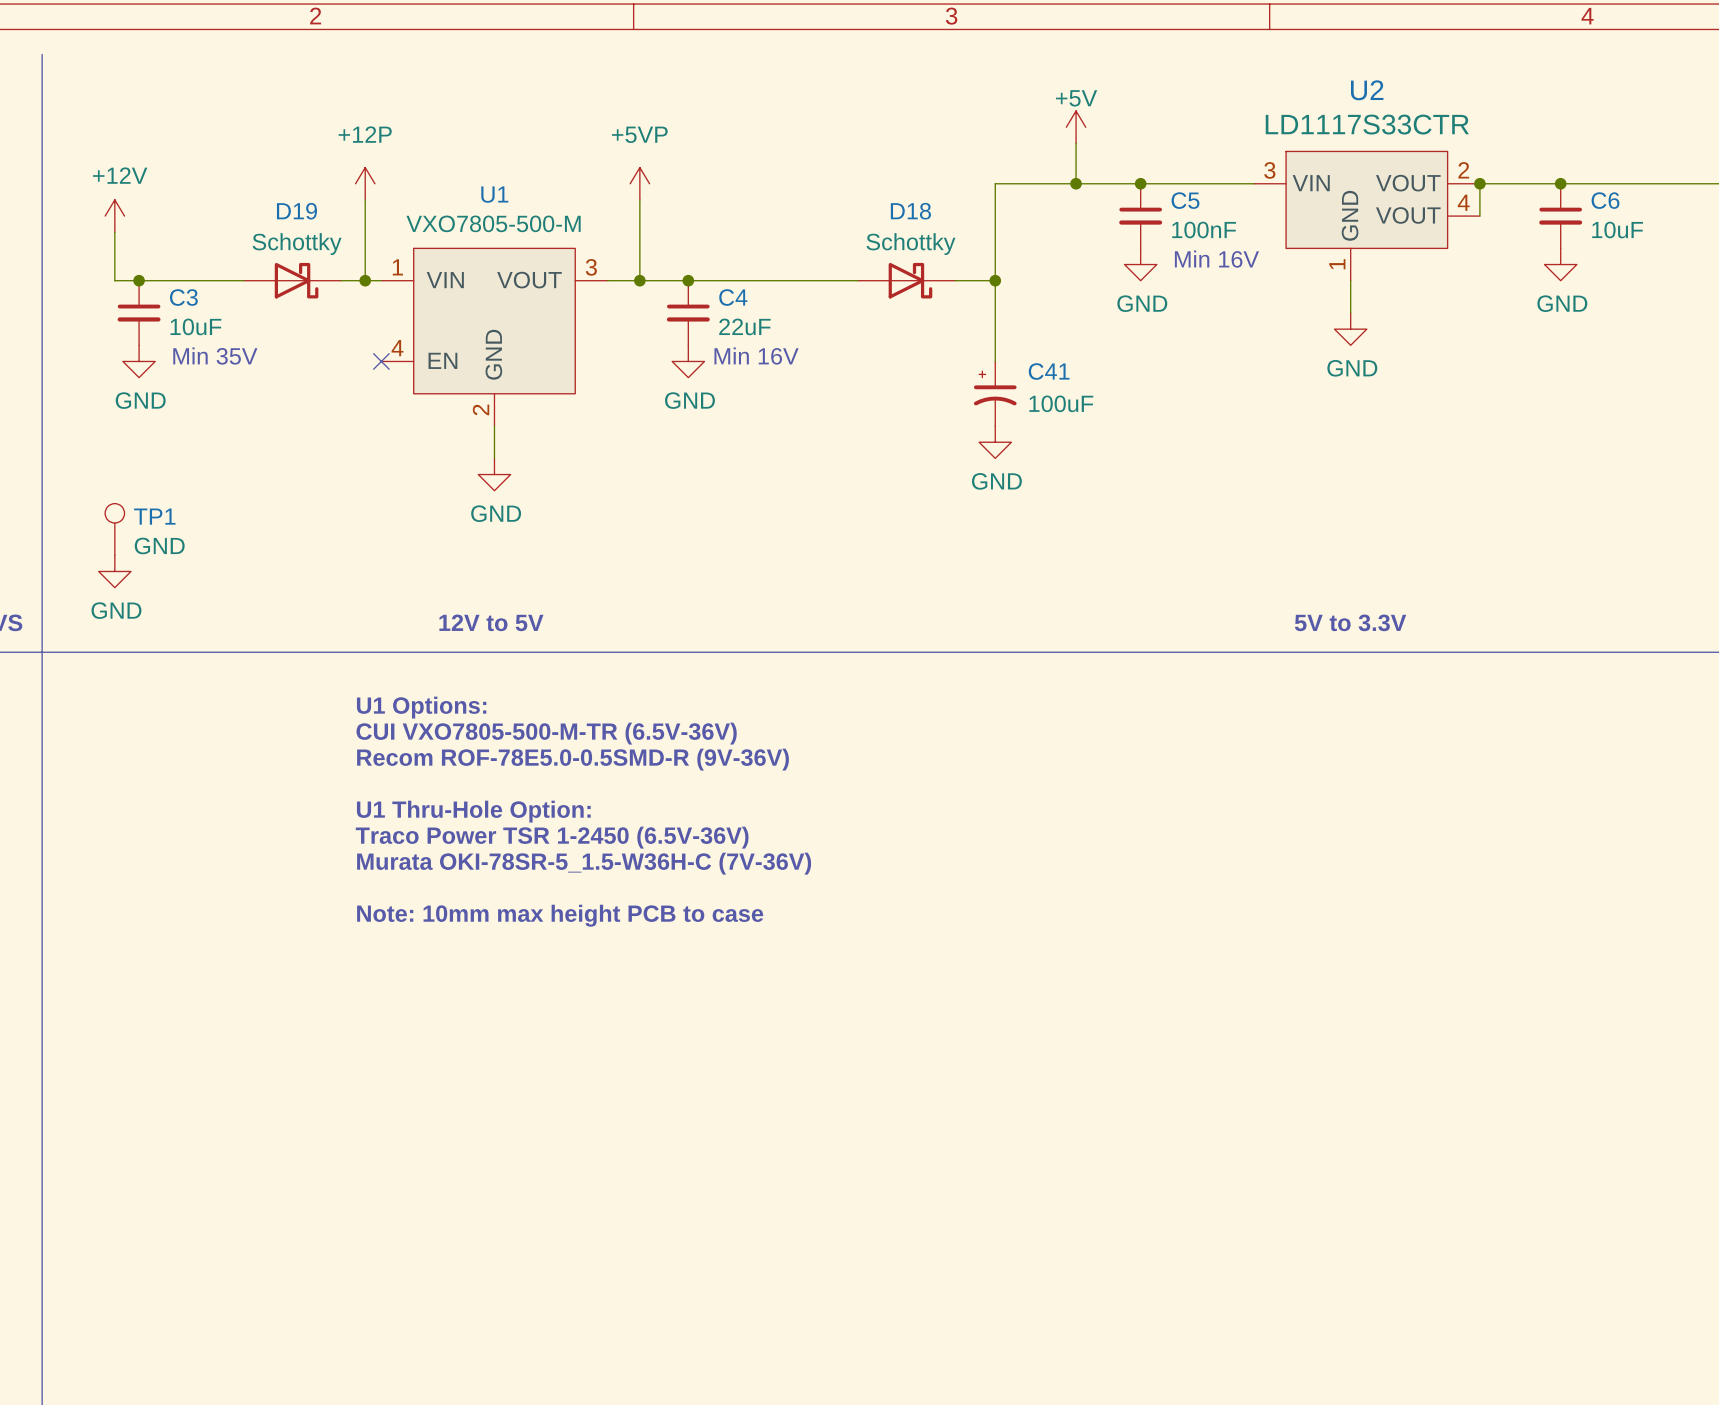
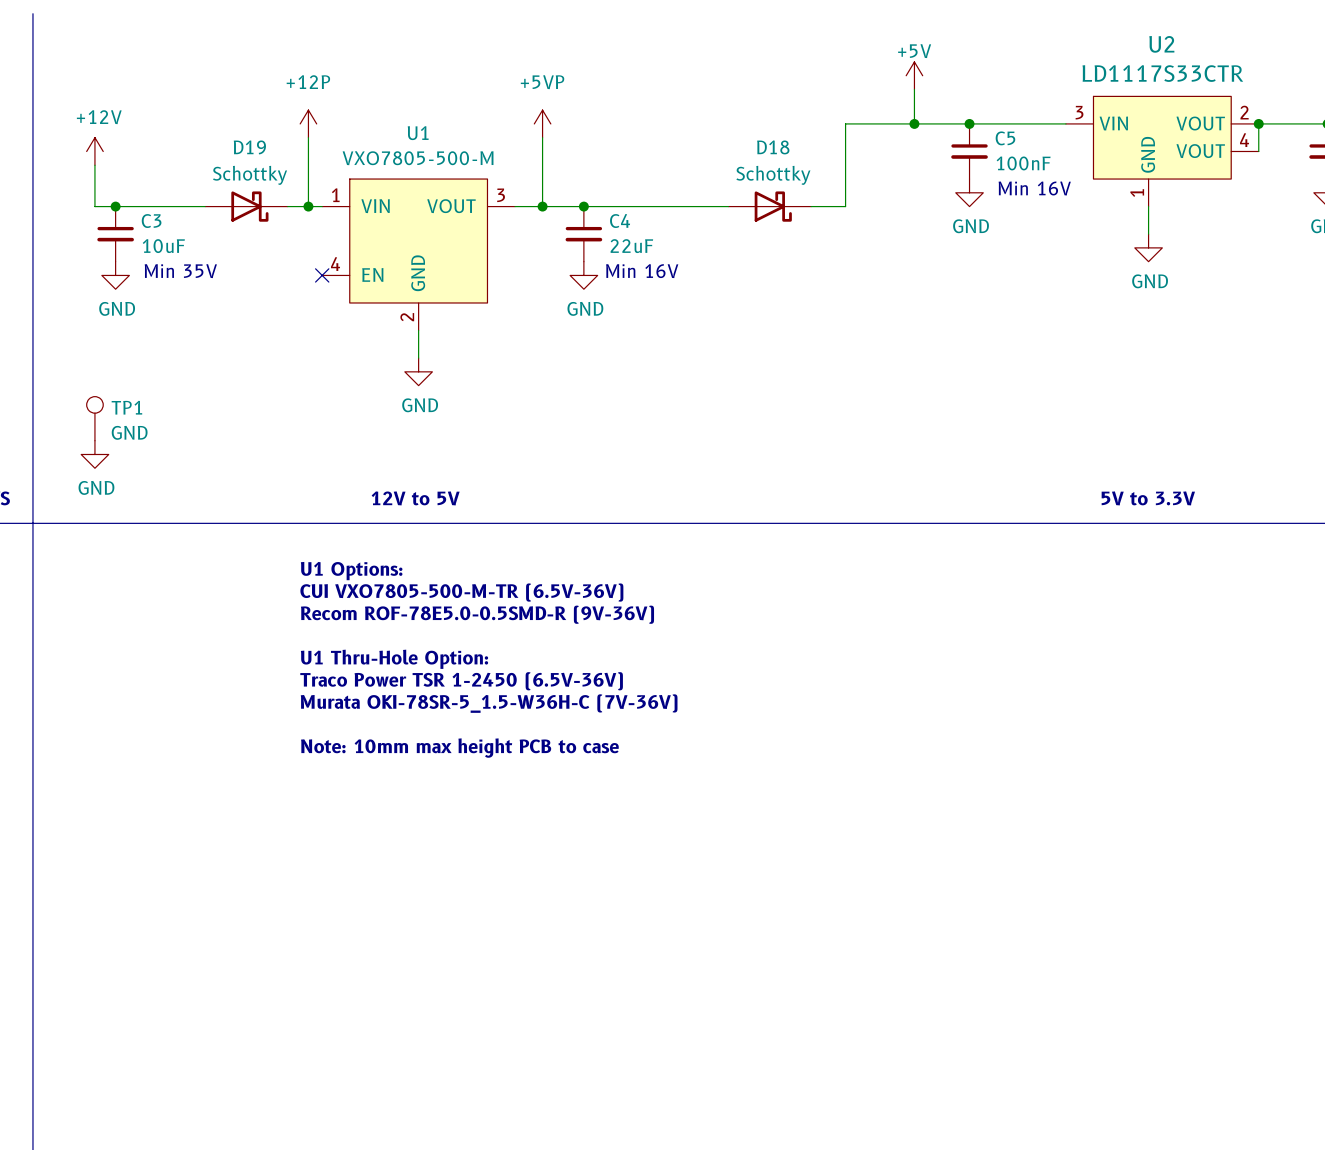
wire: (995, 280) (995, 361) -> none
junction: (995, 280) -> none
C41: 100uF (995, 393) -> none
power symbol: GND (995, 442) -> none

